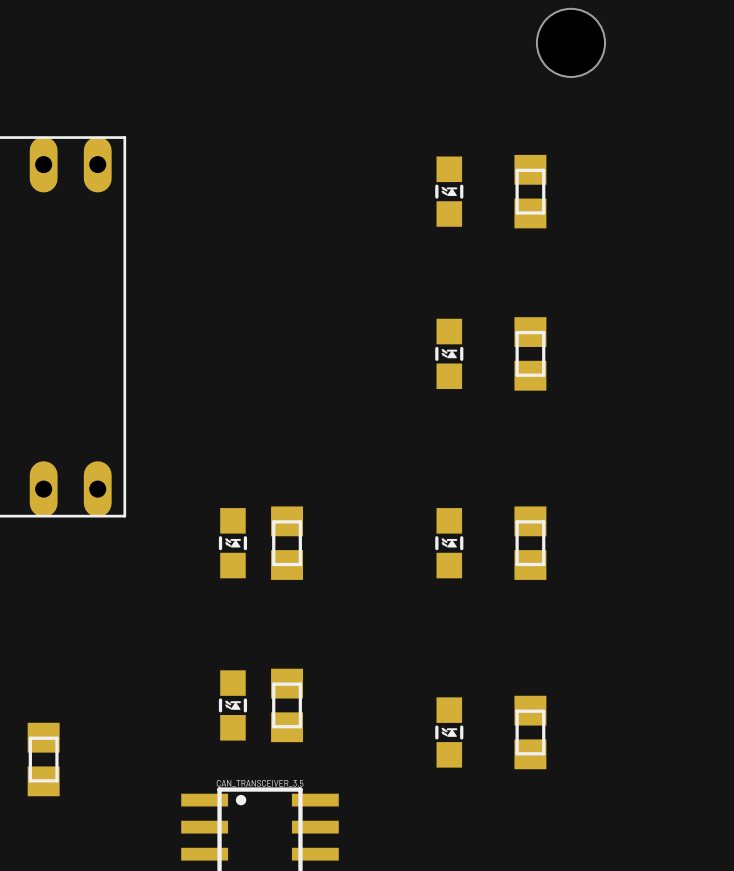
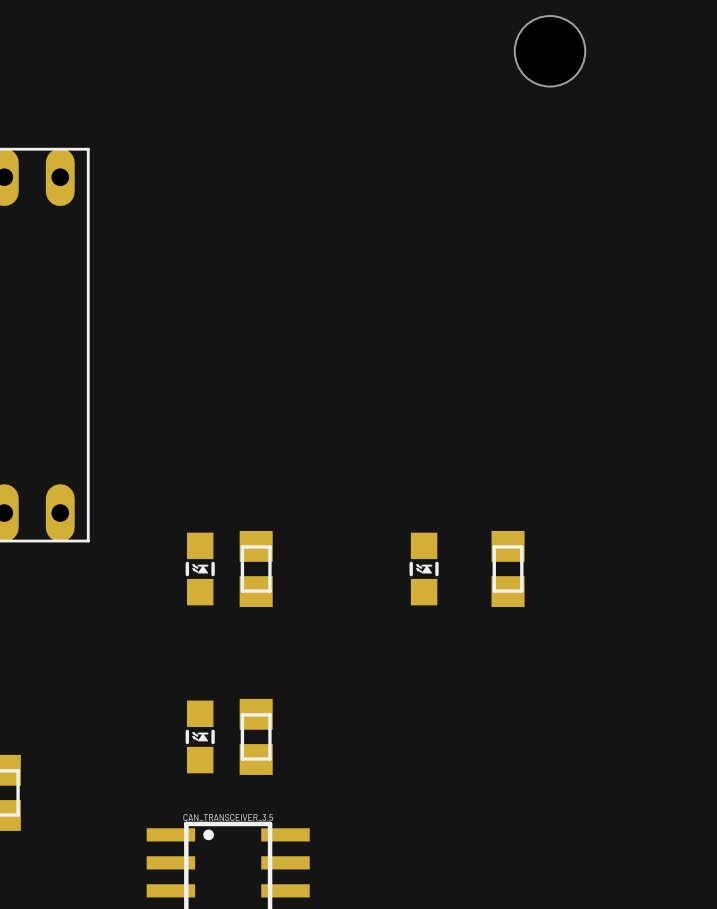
part: (449, 191) -> none
part: (530, 191) -> none
part: (449, 353) -> none
part: (530, 353) -> none
part: (449, 732) -> none
part: (530, 732) -> none

